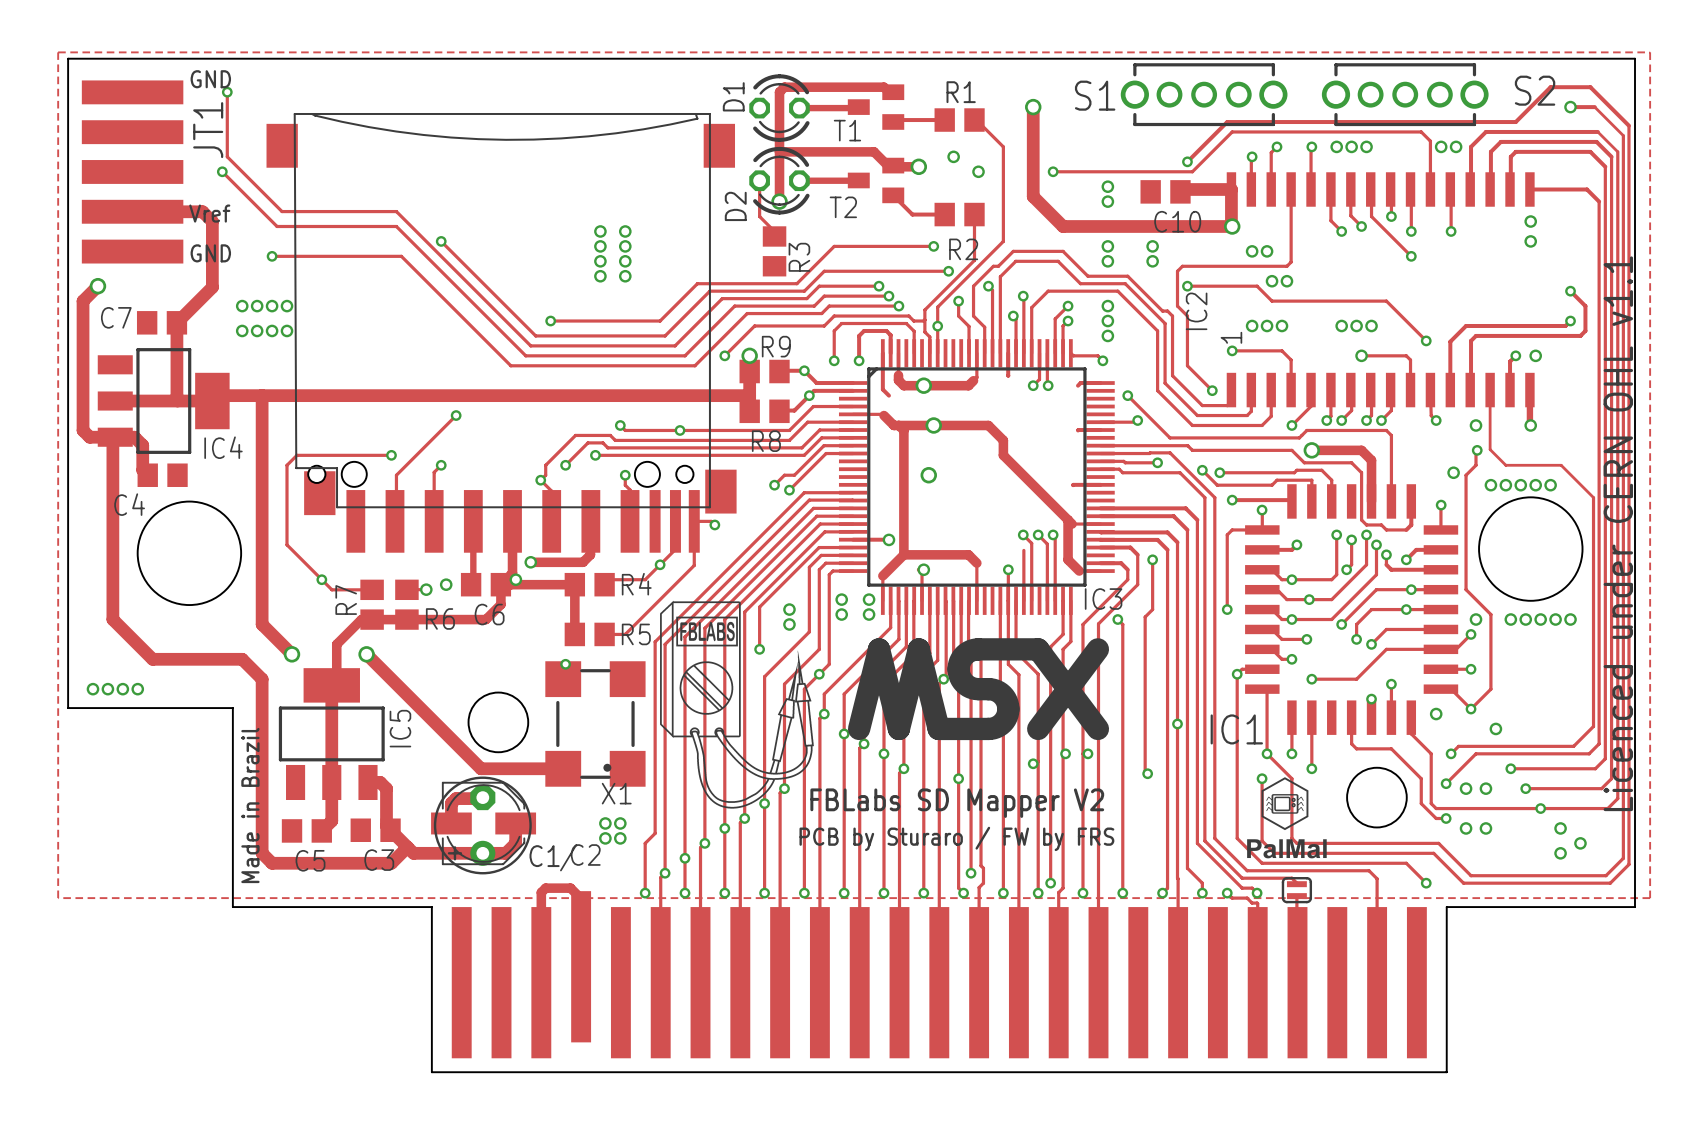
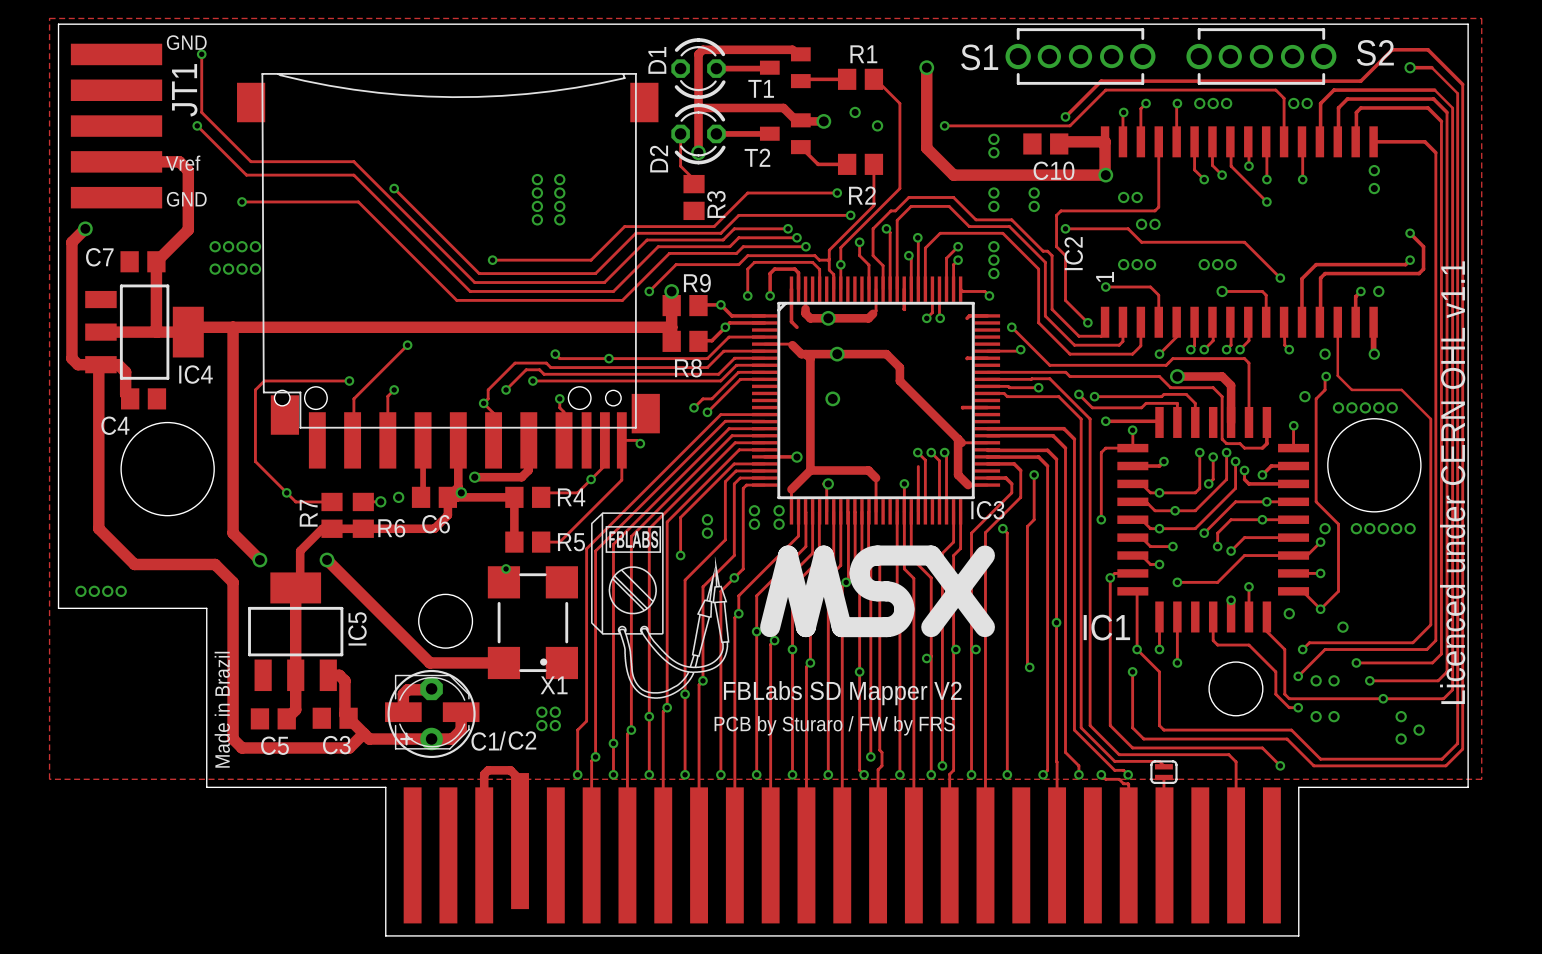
drawing: [1247, 777, 1327, 859] -> none

